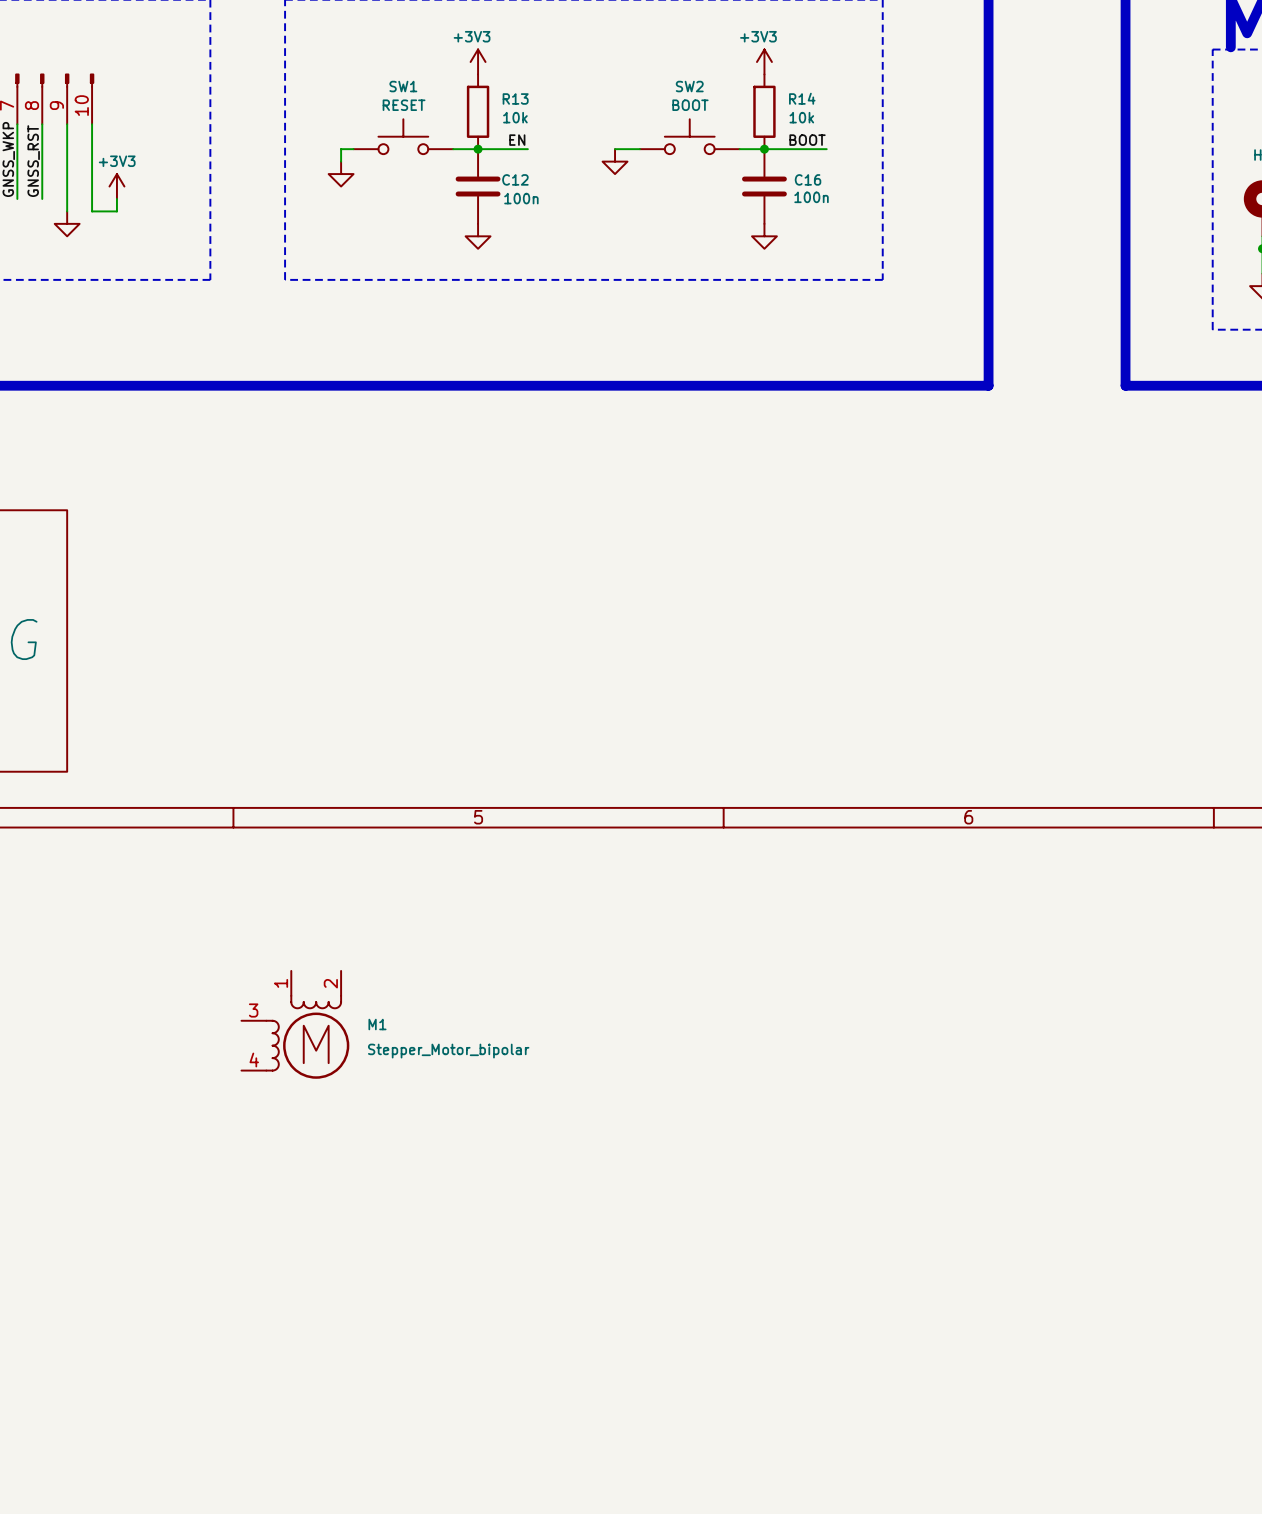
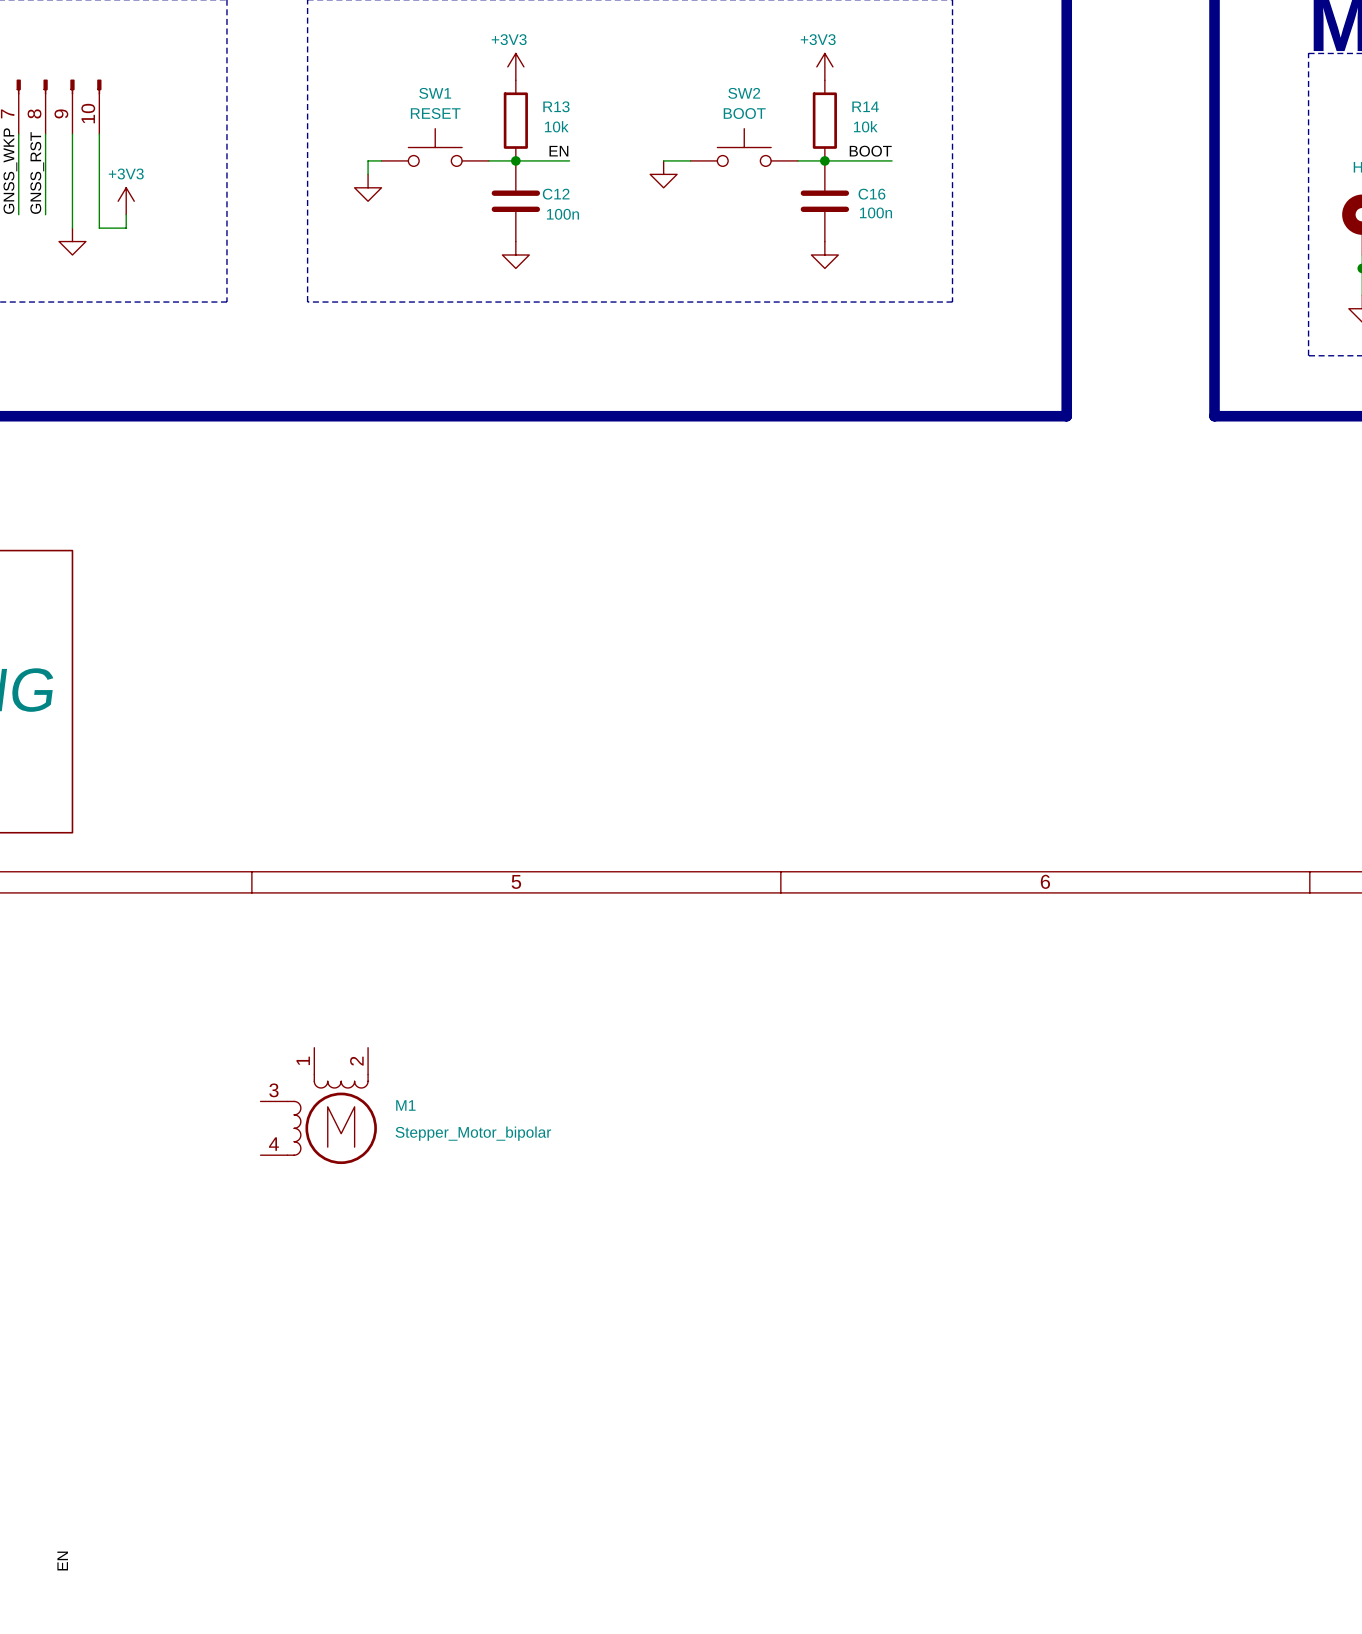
label: none -> EN (62, 1561)

